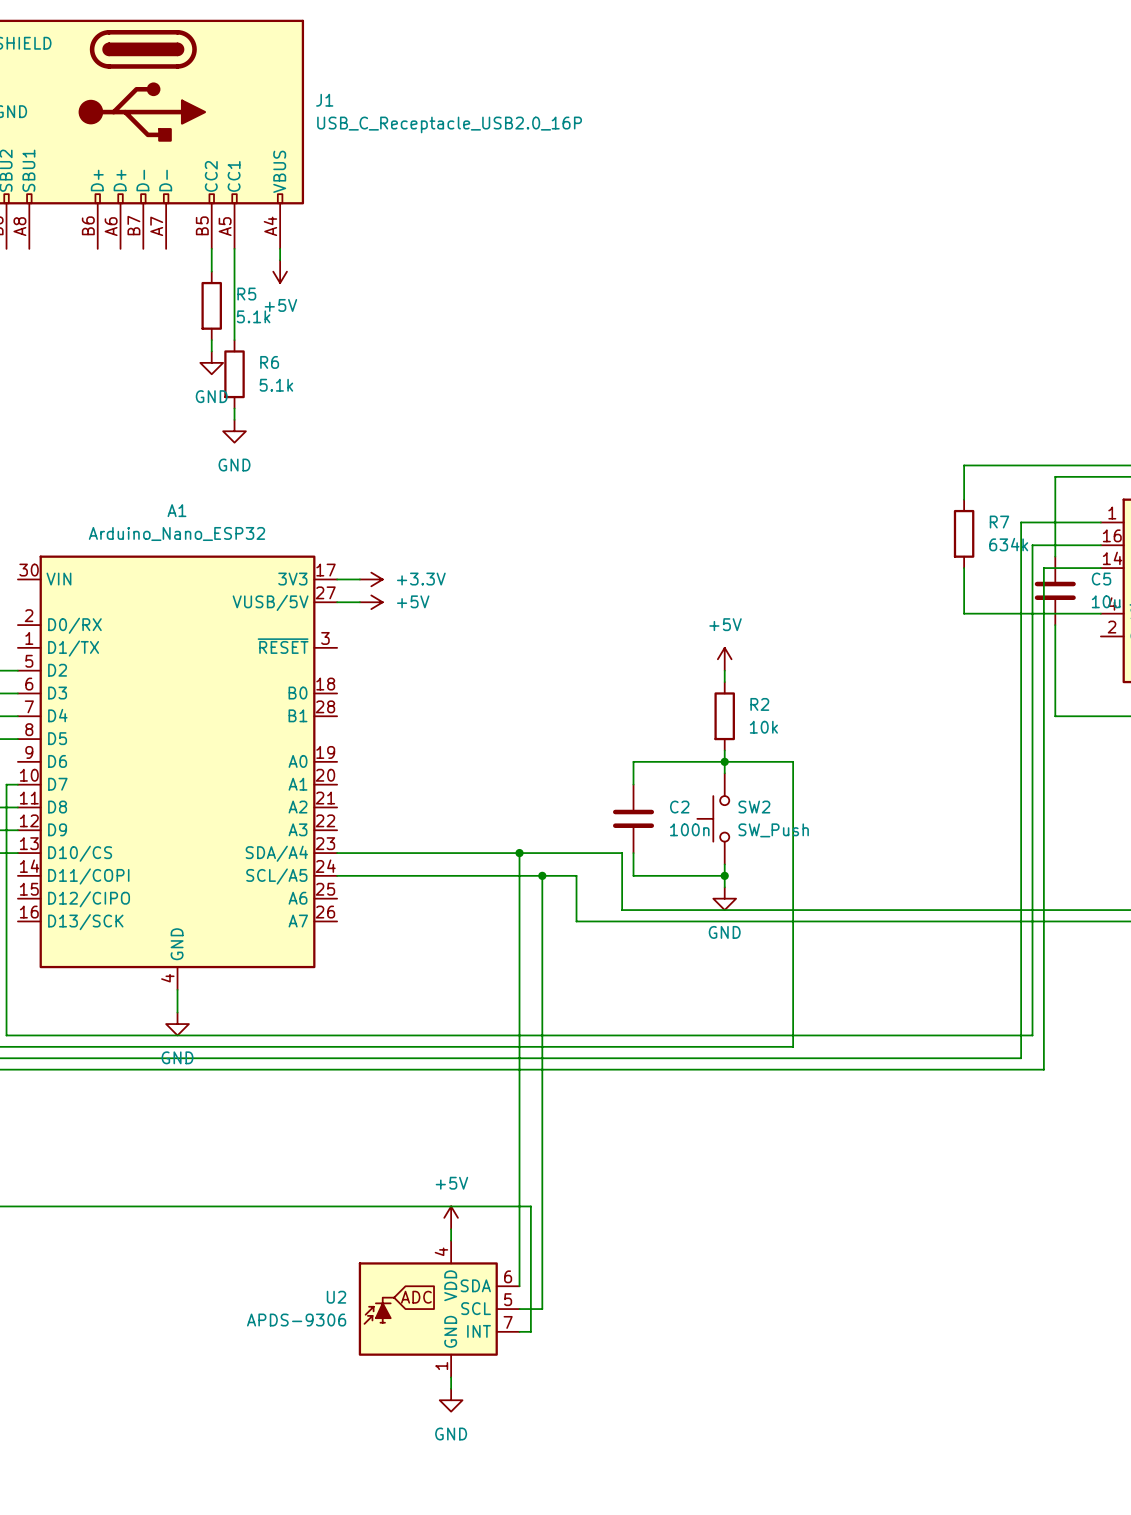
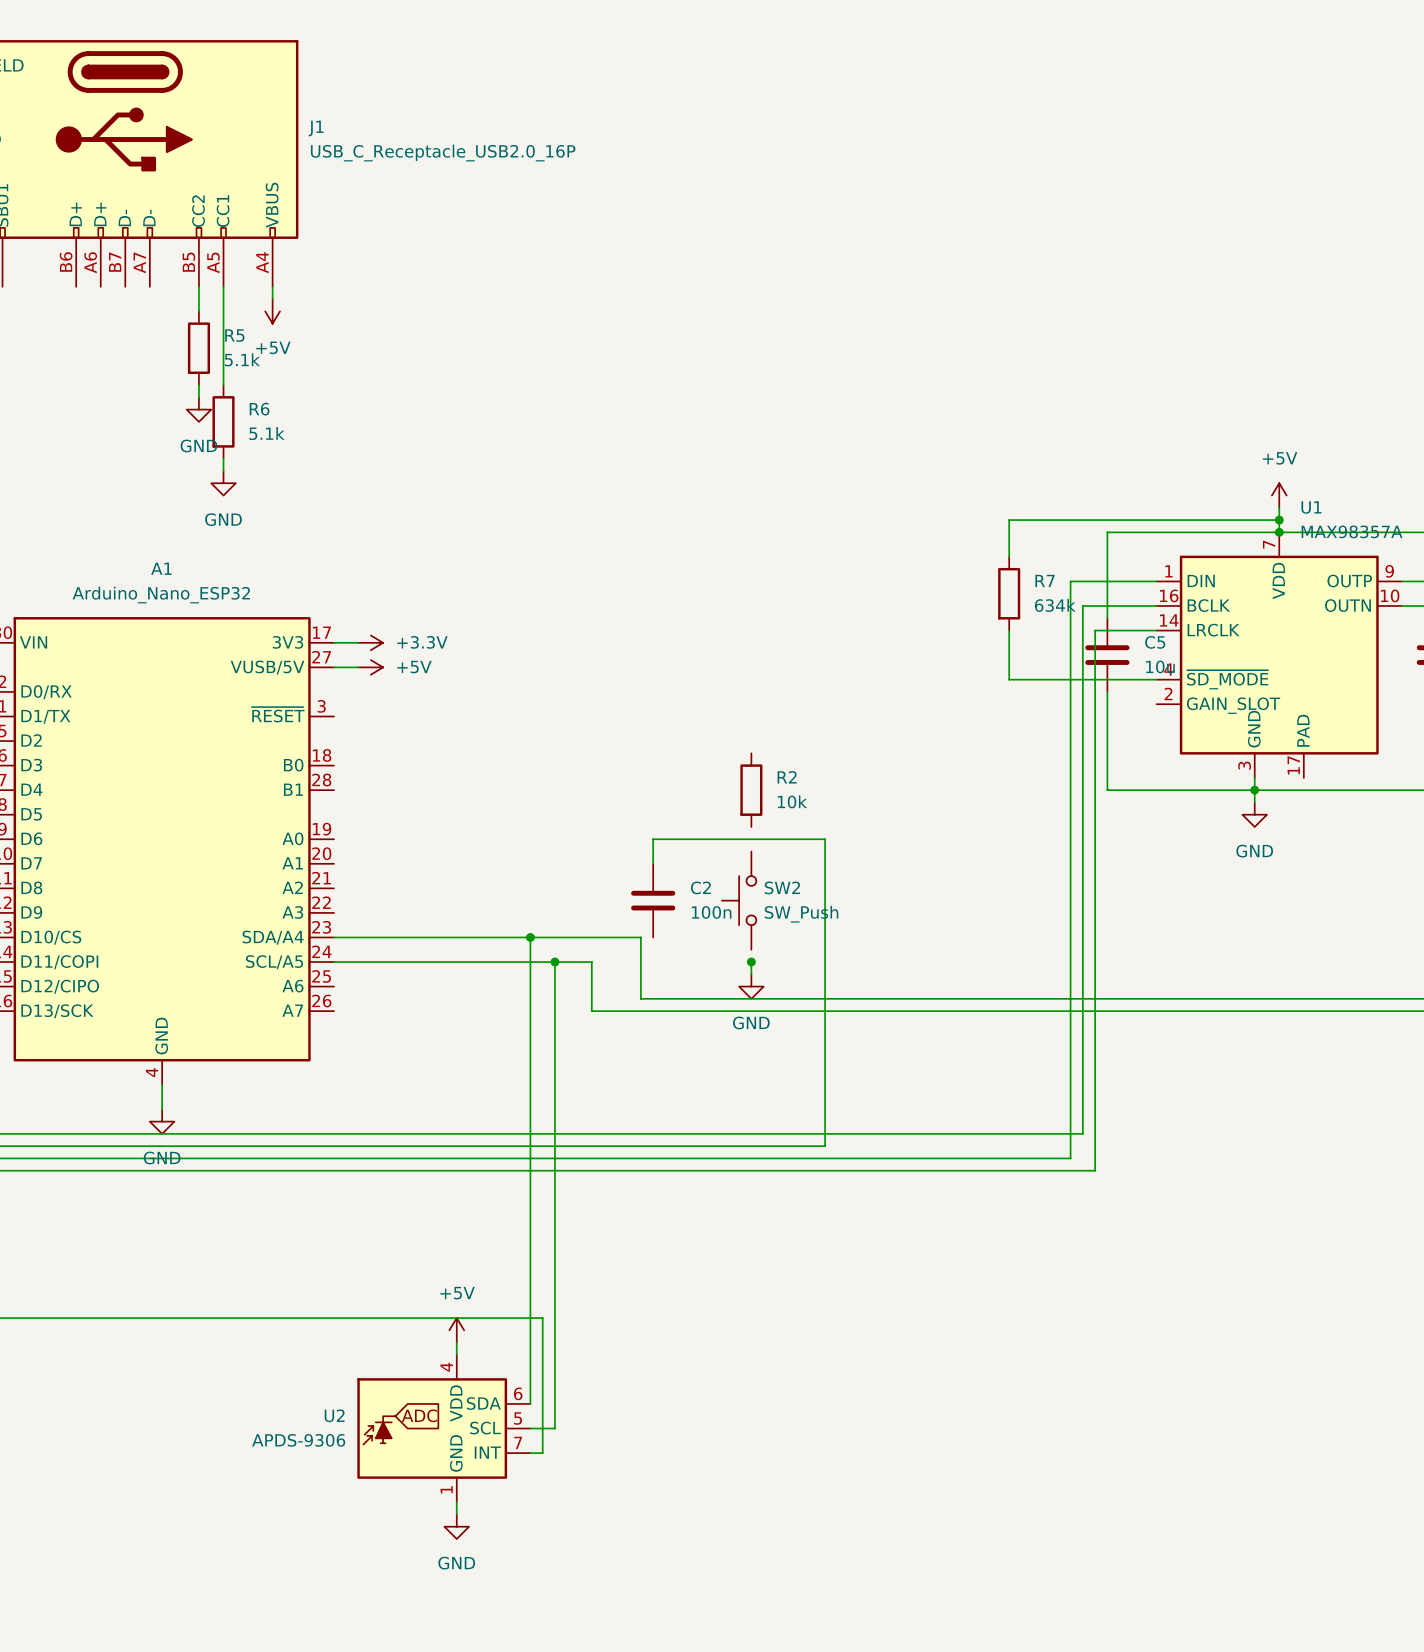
power symbol: +5V (724, 659) -> none
wire: (724, 670) (724, 682) -> none
wire: (724, 750) (724, 773) -> none
junction: (724, 761) -> none
wire: (633, 853) (633, 875) (724, 875) (724, 864) -> none

